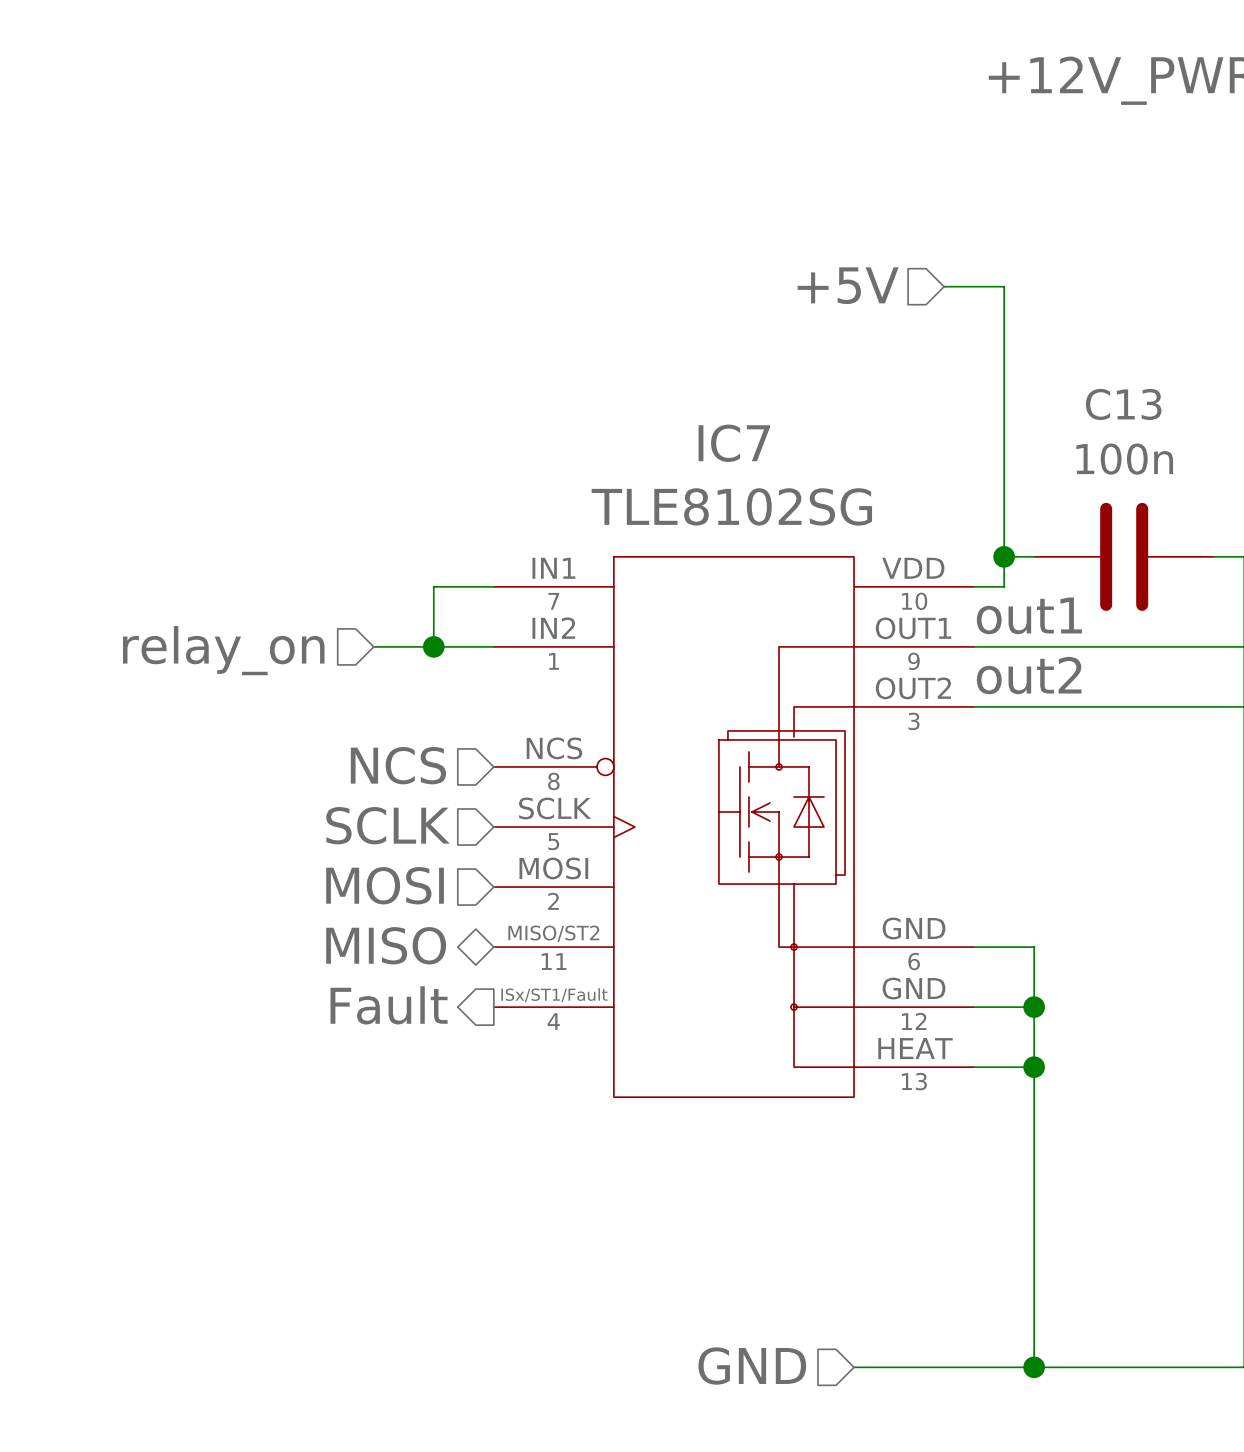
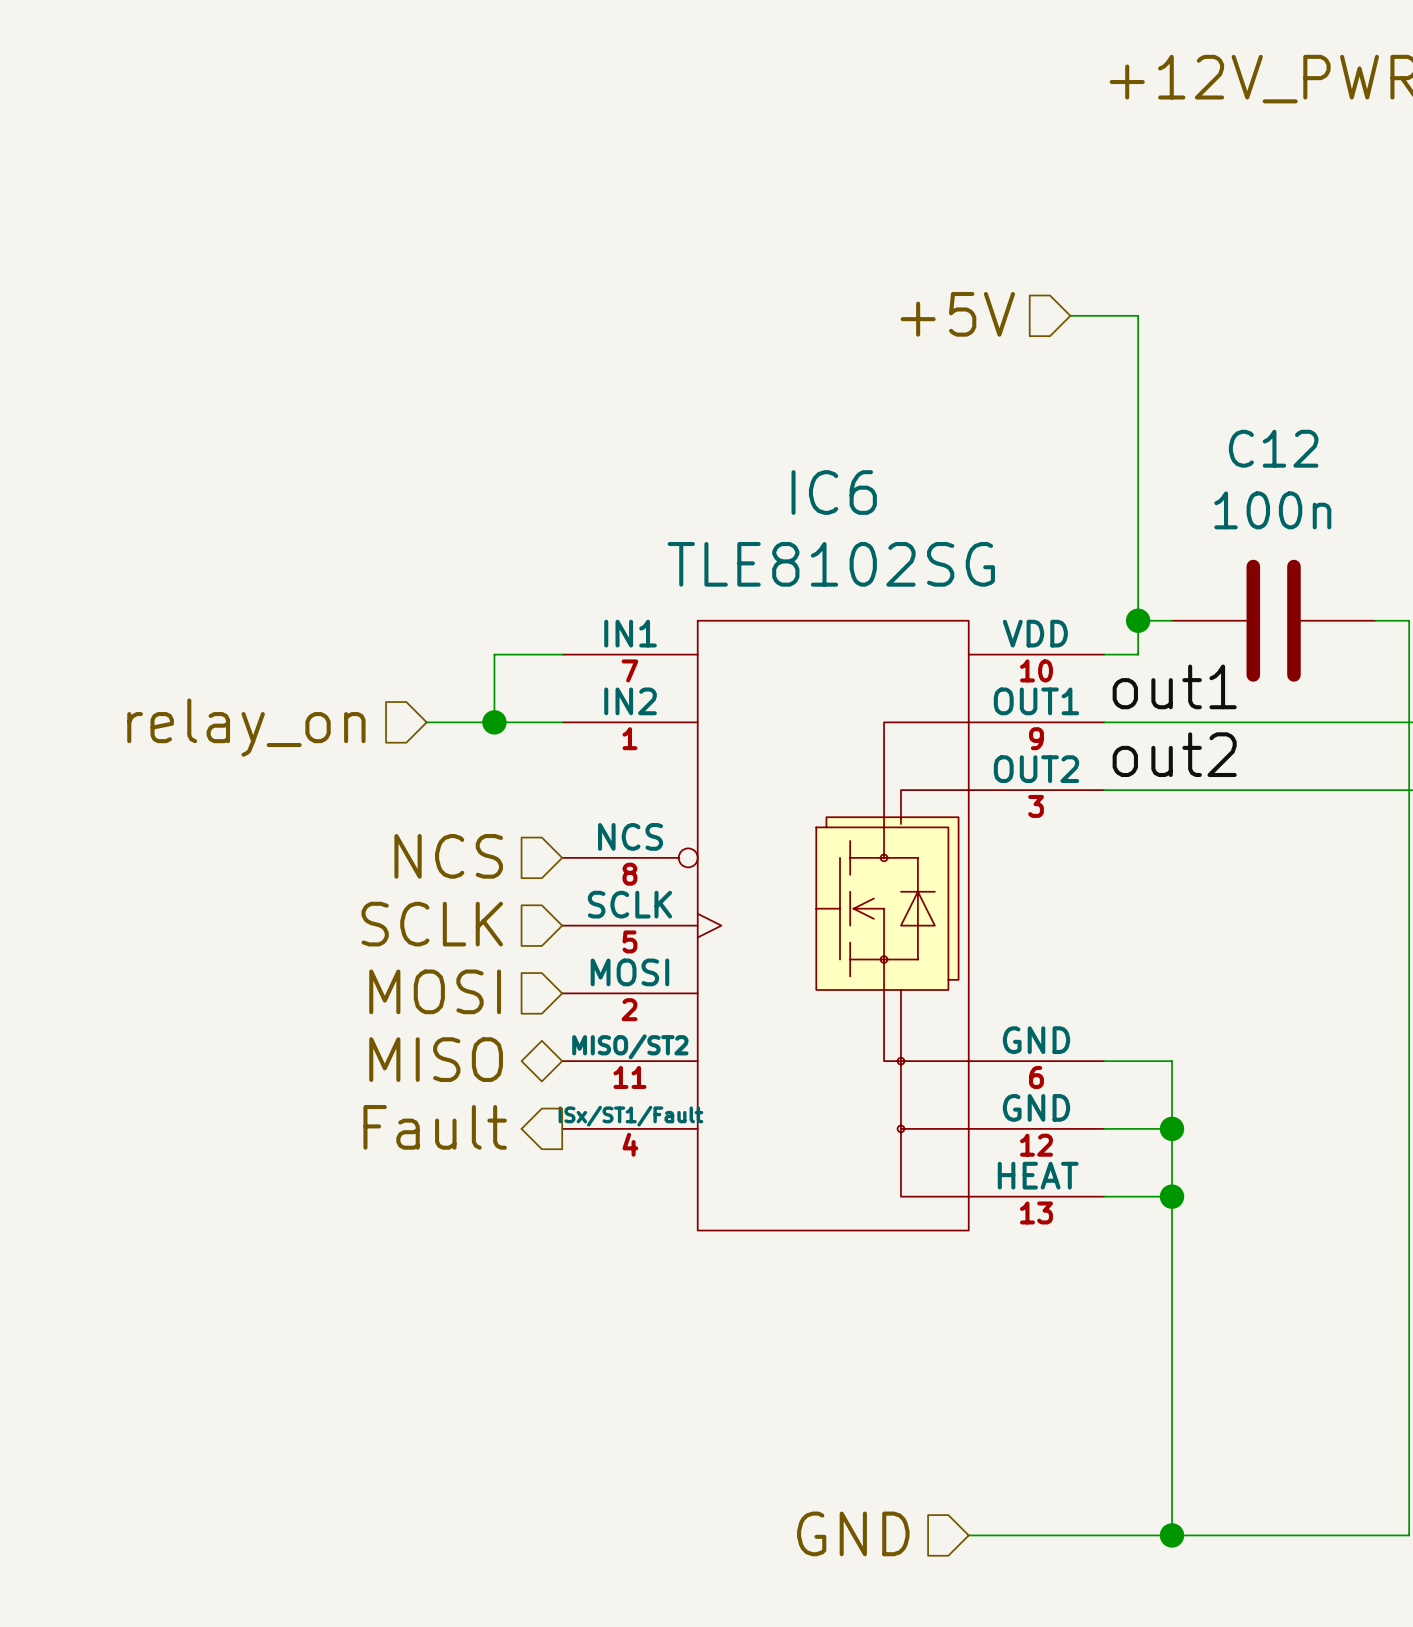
C13 name: C13 (1123, 404) -> C12 (1273, 448)
IC7 name: IC7 (734, 443) -> IC6 (834, 492)

